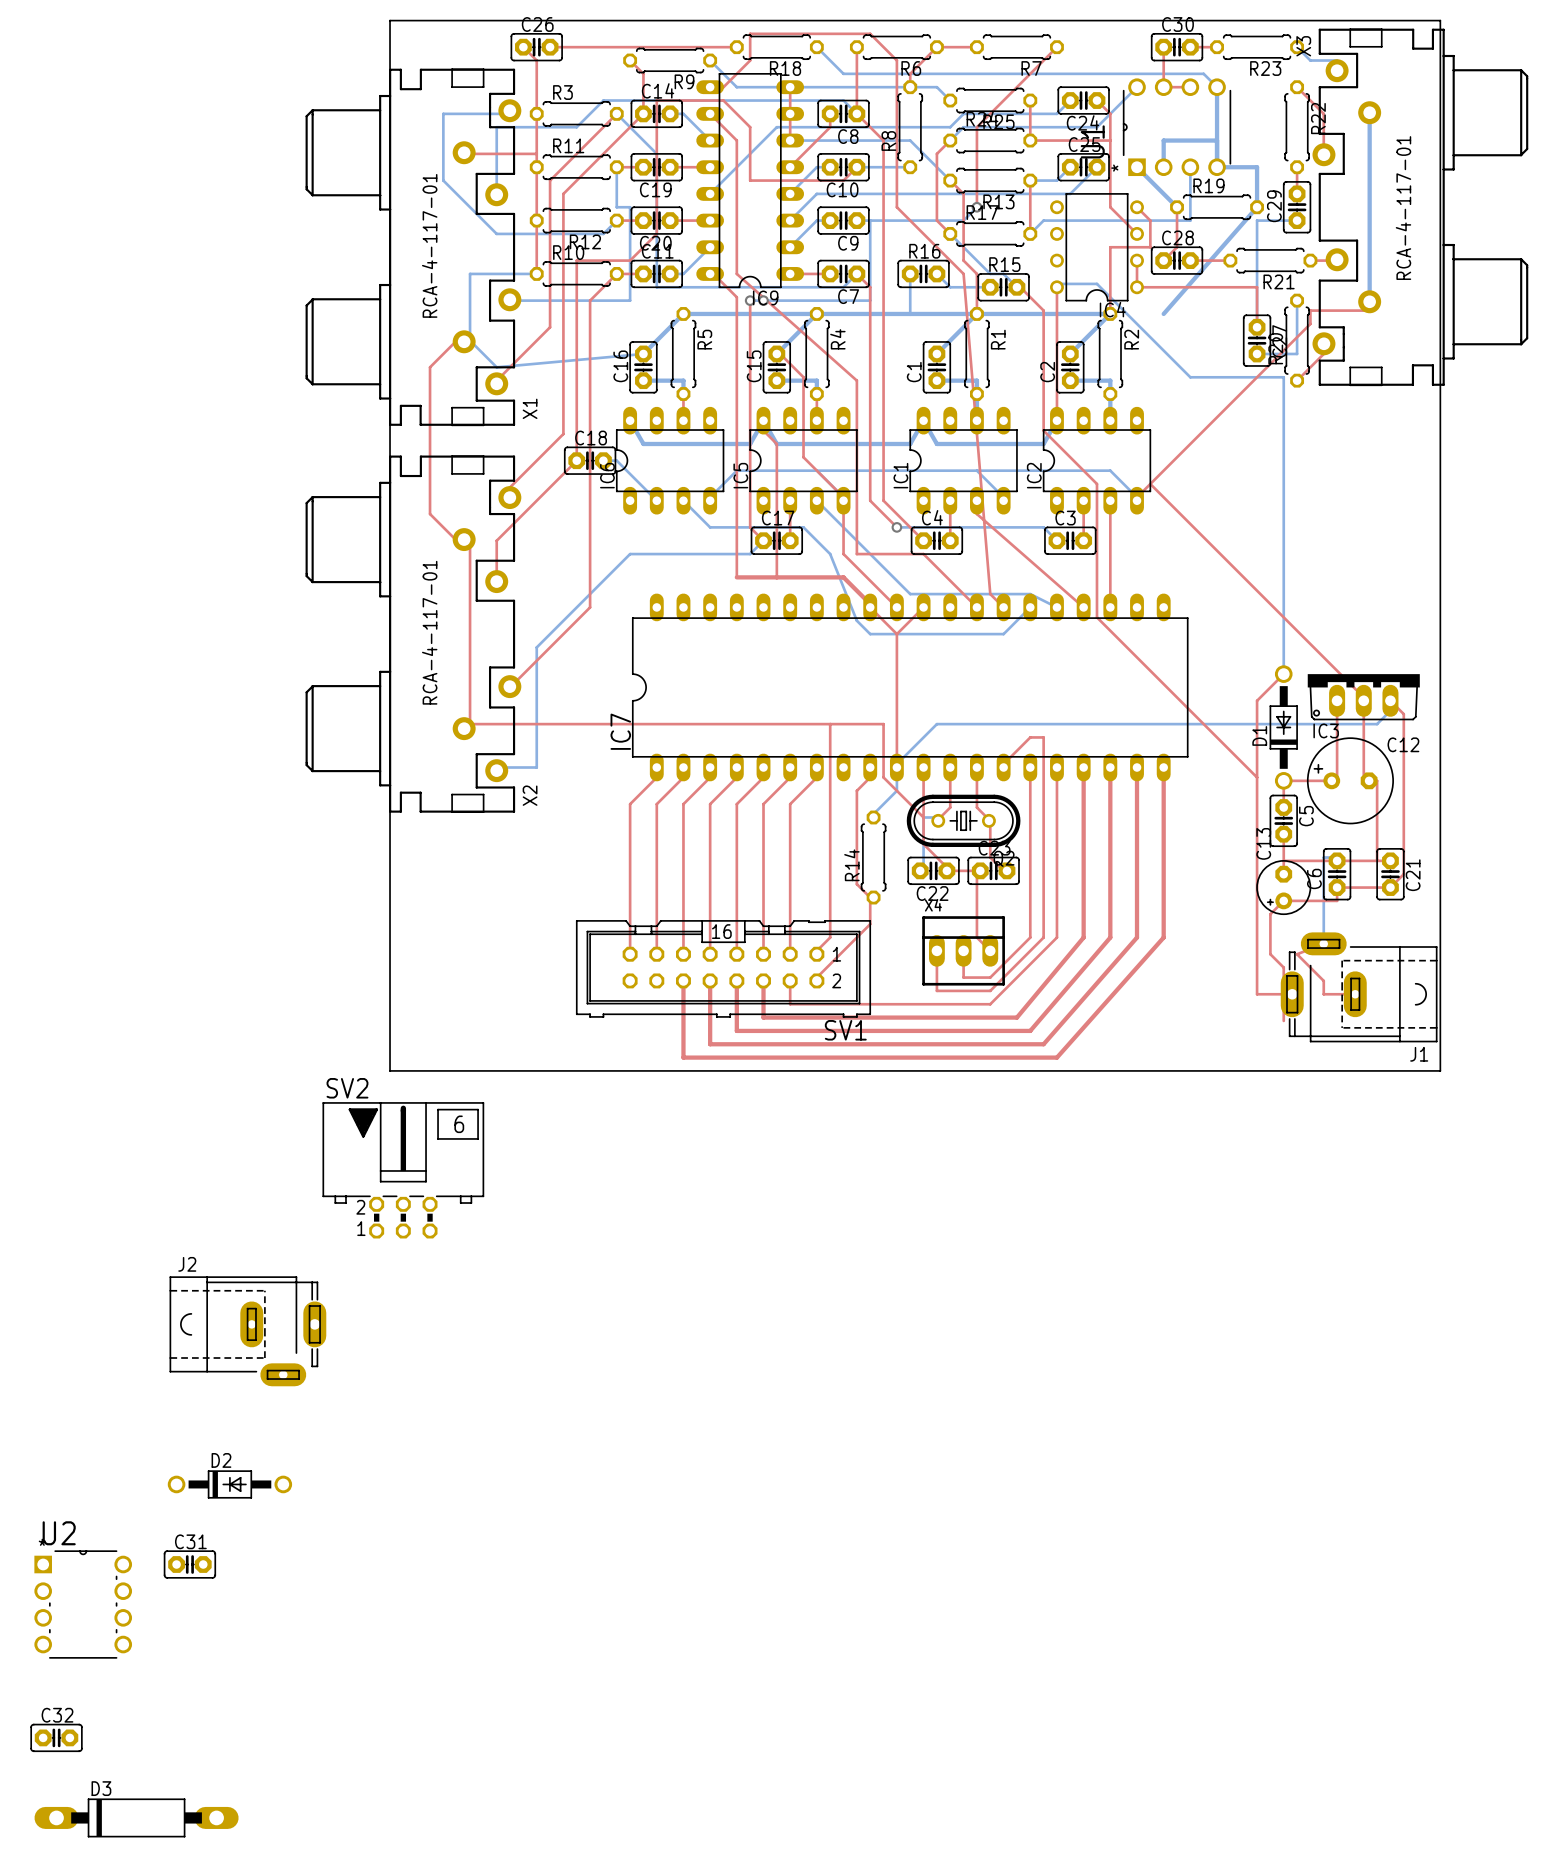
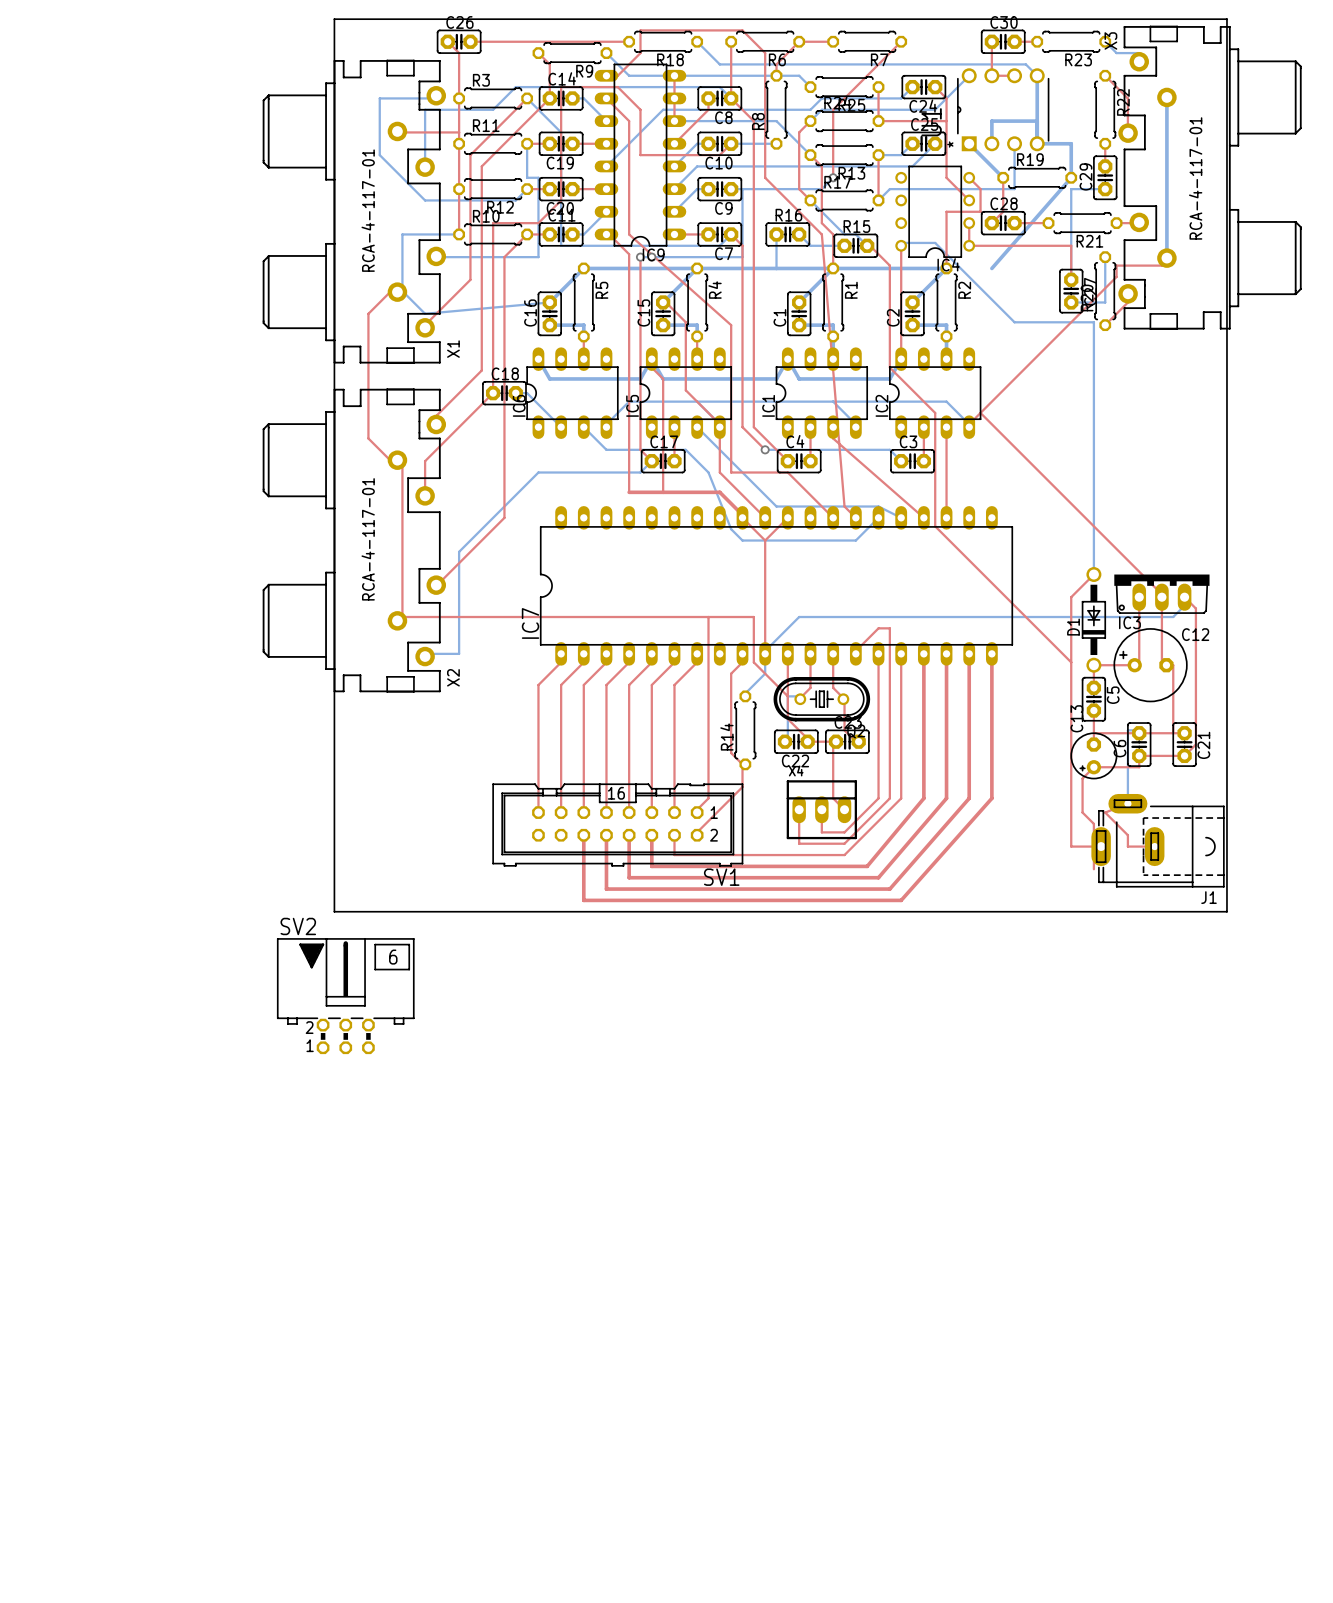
J2: (248, 1331) -> none
D2: (229, 1484) -> none
C31: (189, 1564) -> none
U2: (83, 1604) -> none
C32: (56, 1737) -> none
D3: (136, 1817) -> none

